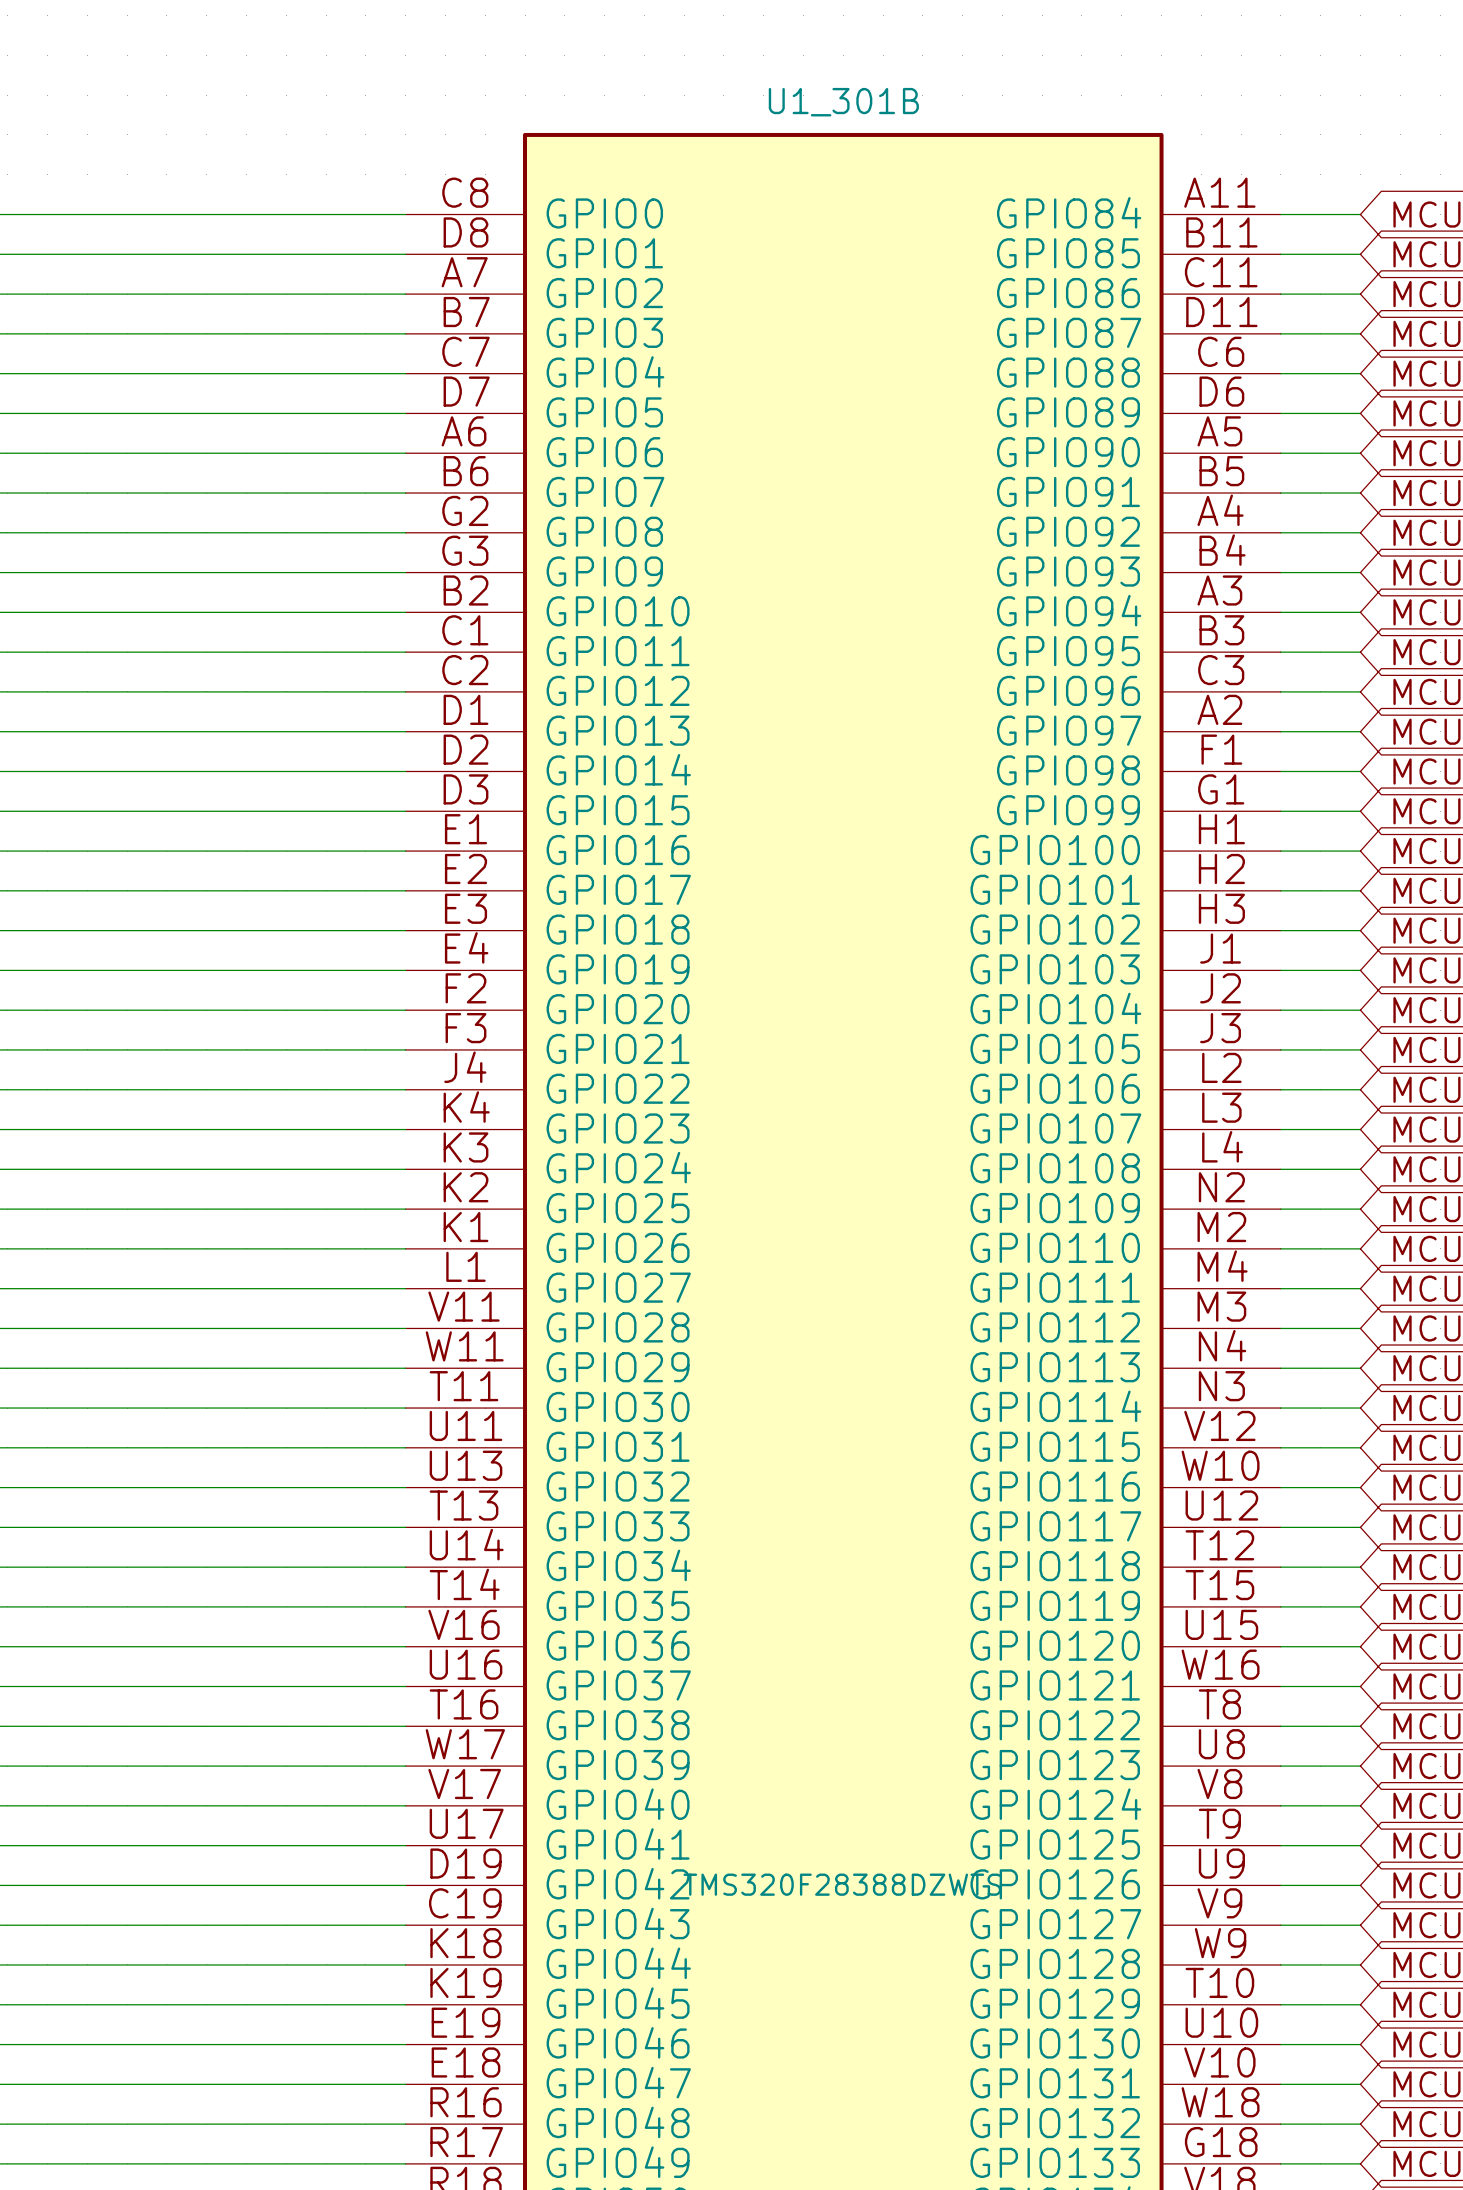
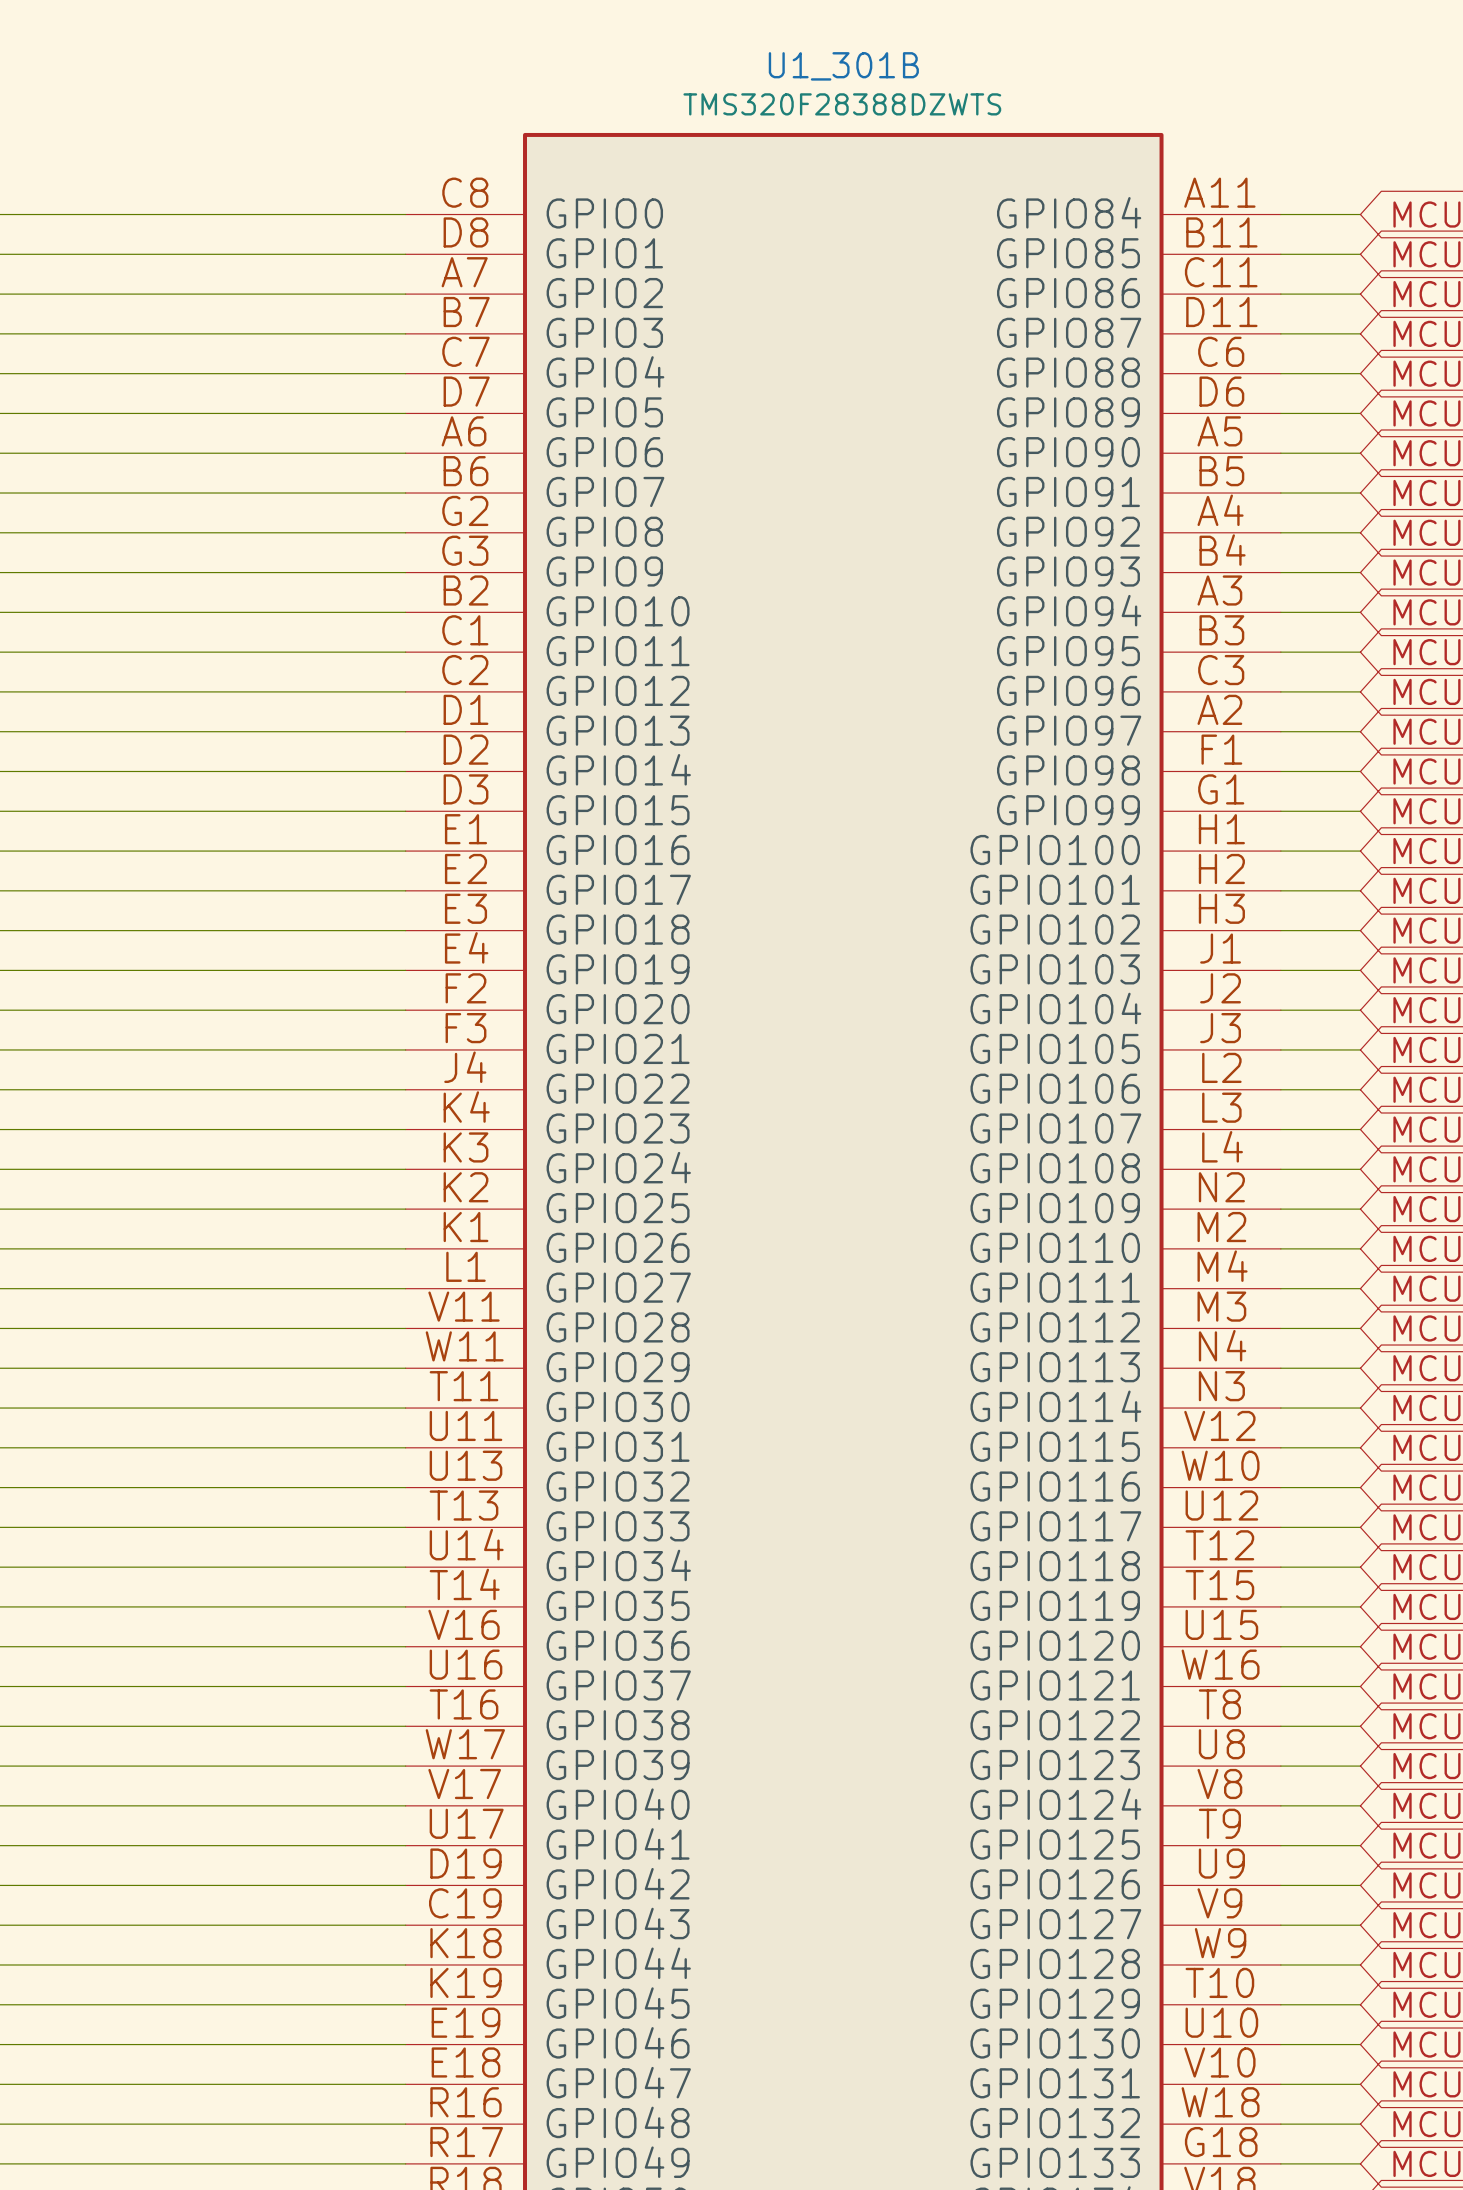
U1_301B name position: U1_301B (843, 102) -> U1_301B (843, 66)
U1_301B value position: TMS320F28388DZWTS (842, 1884) -> TMS320F28388DZWTS (842, 104)

